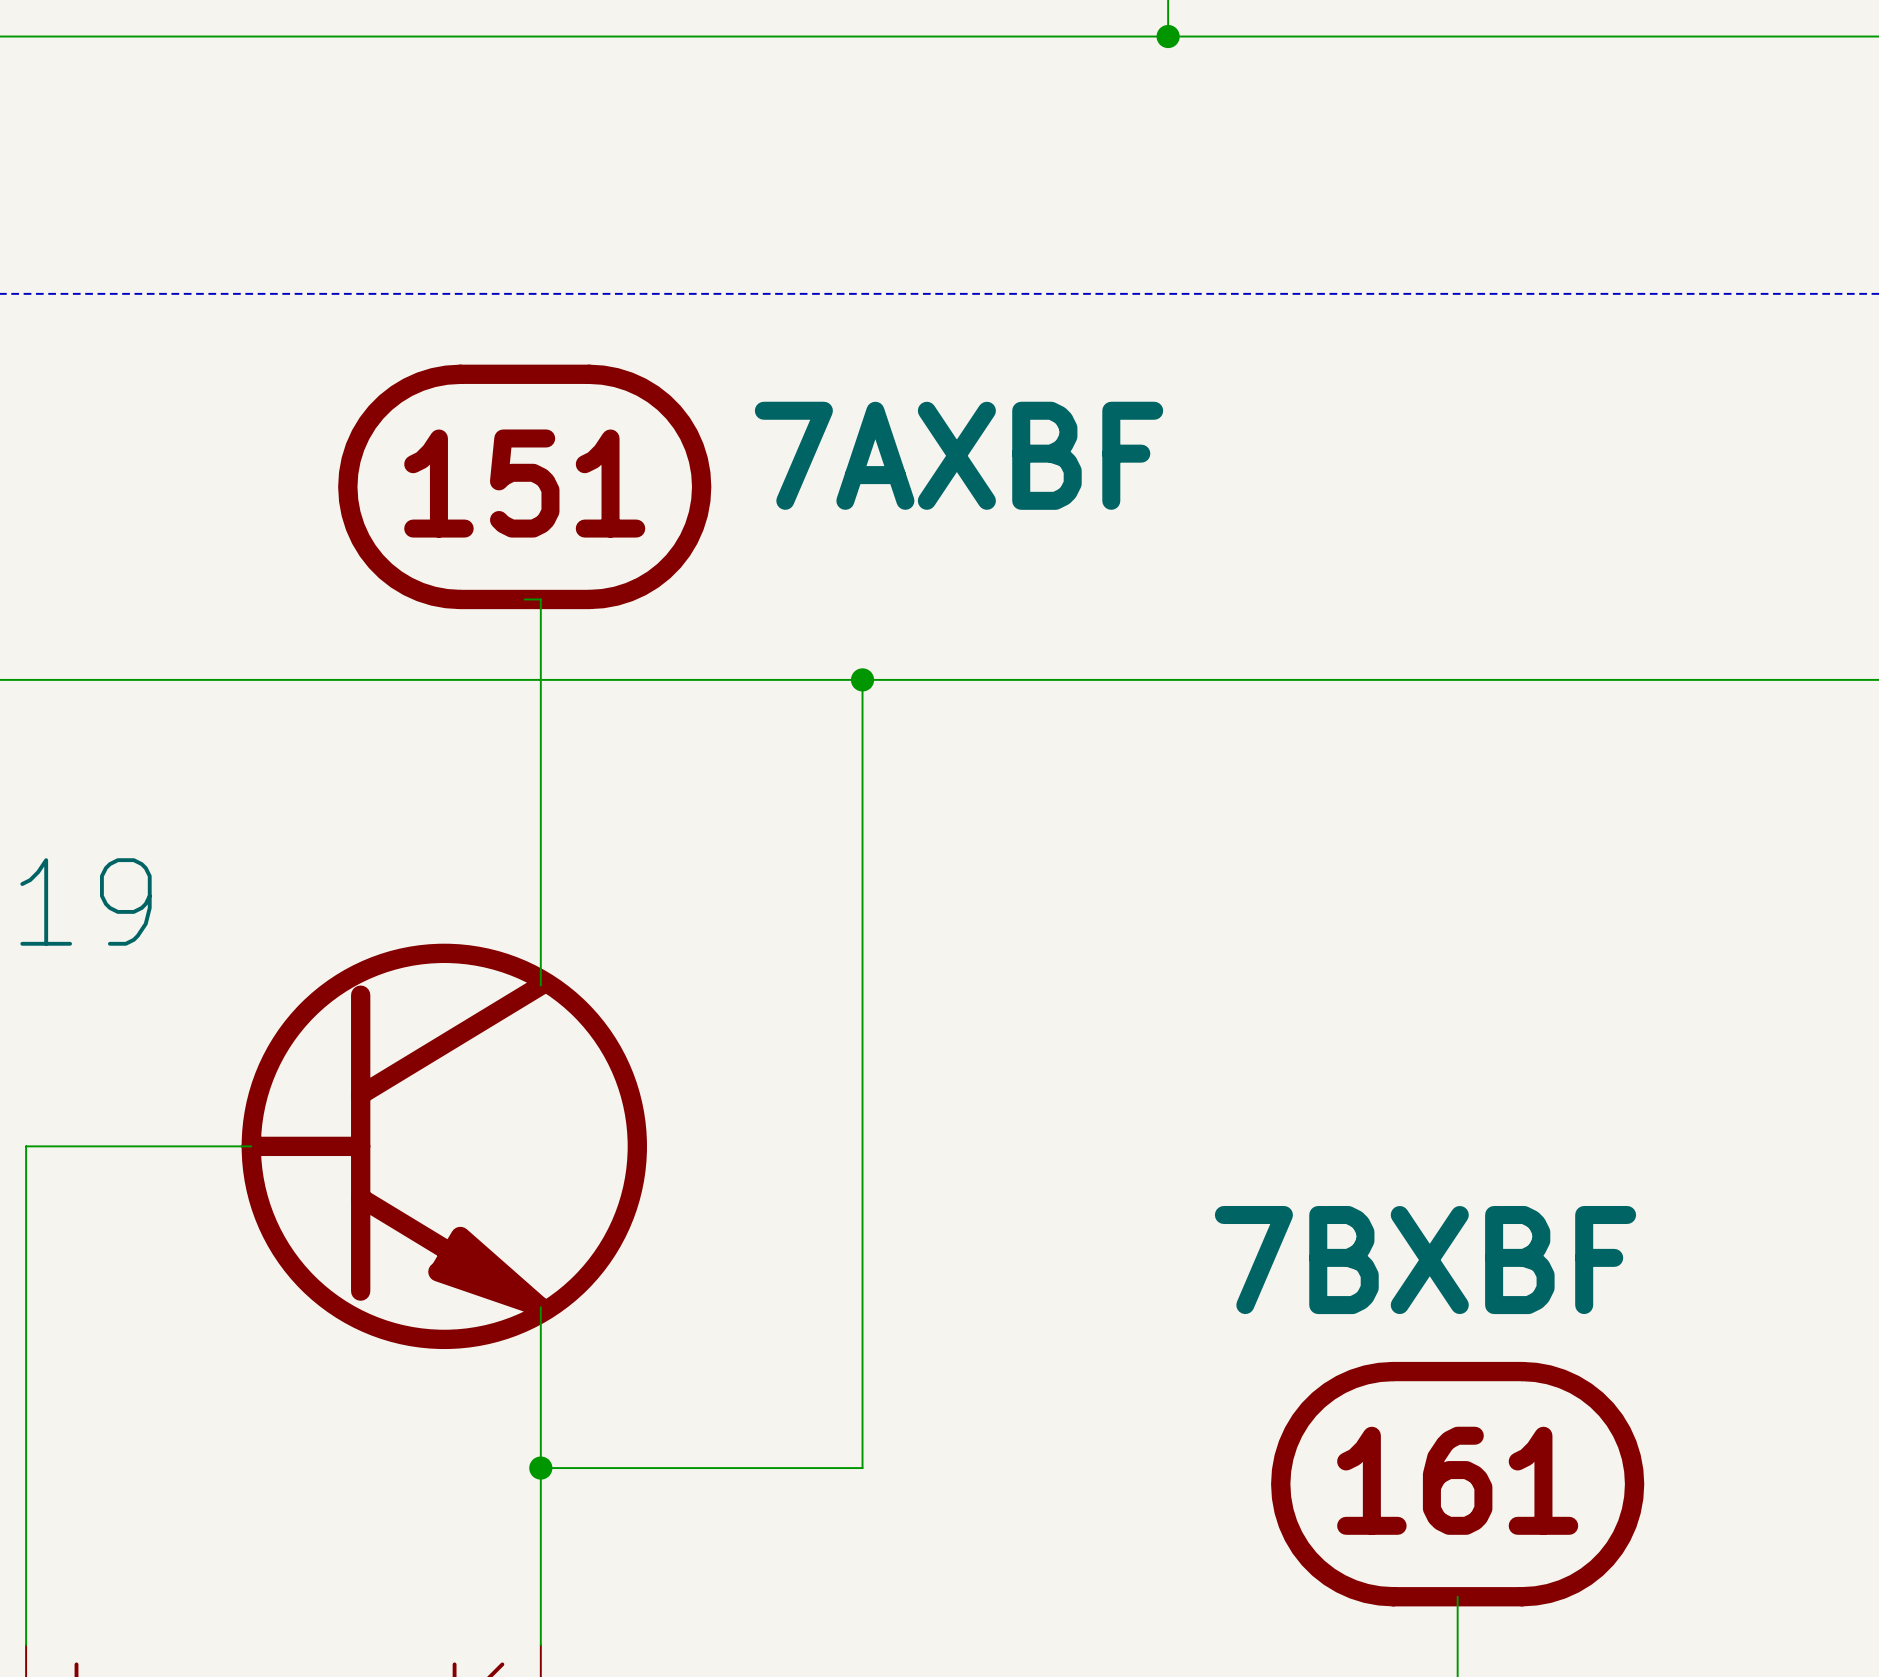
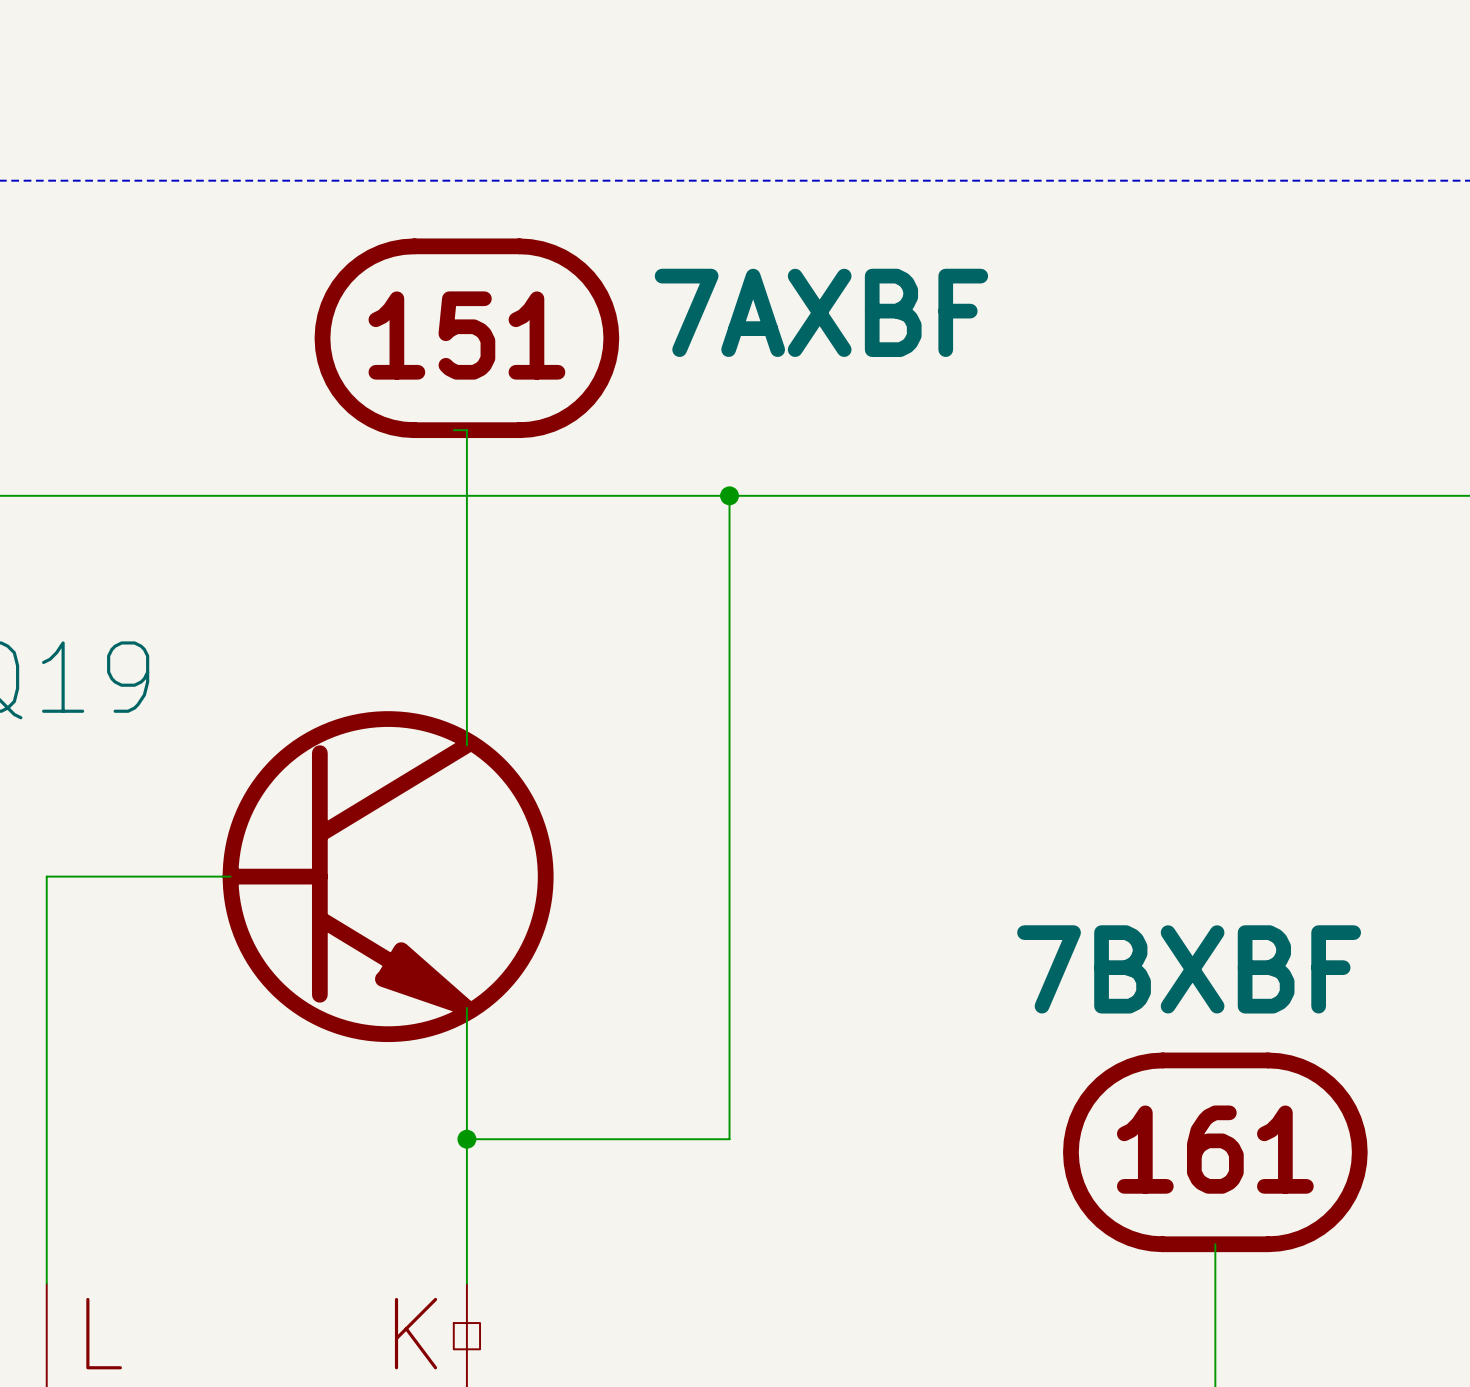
part position: (524, 486) -> (466, 338)

